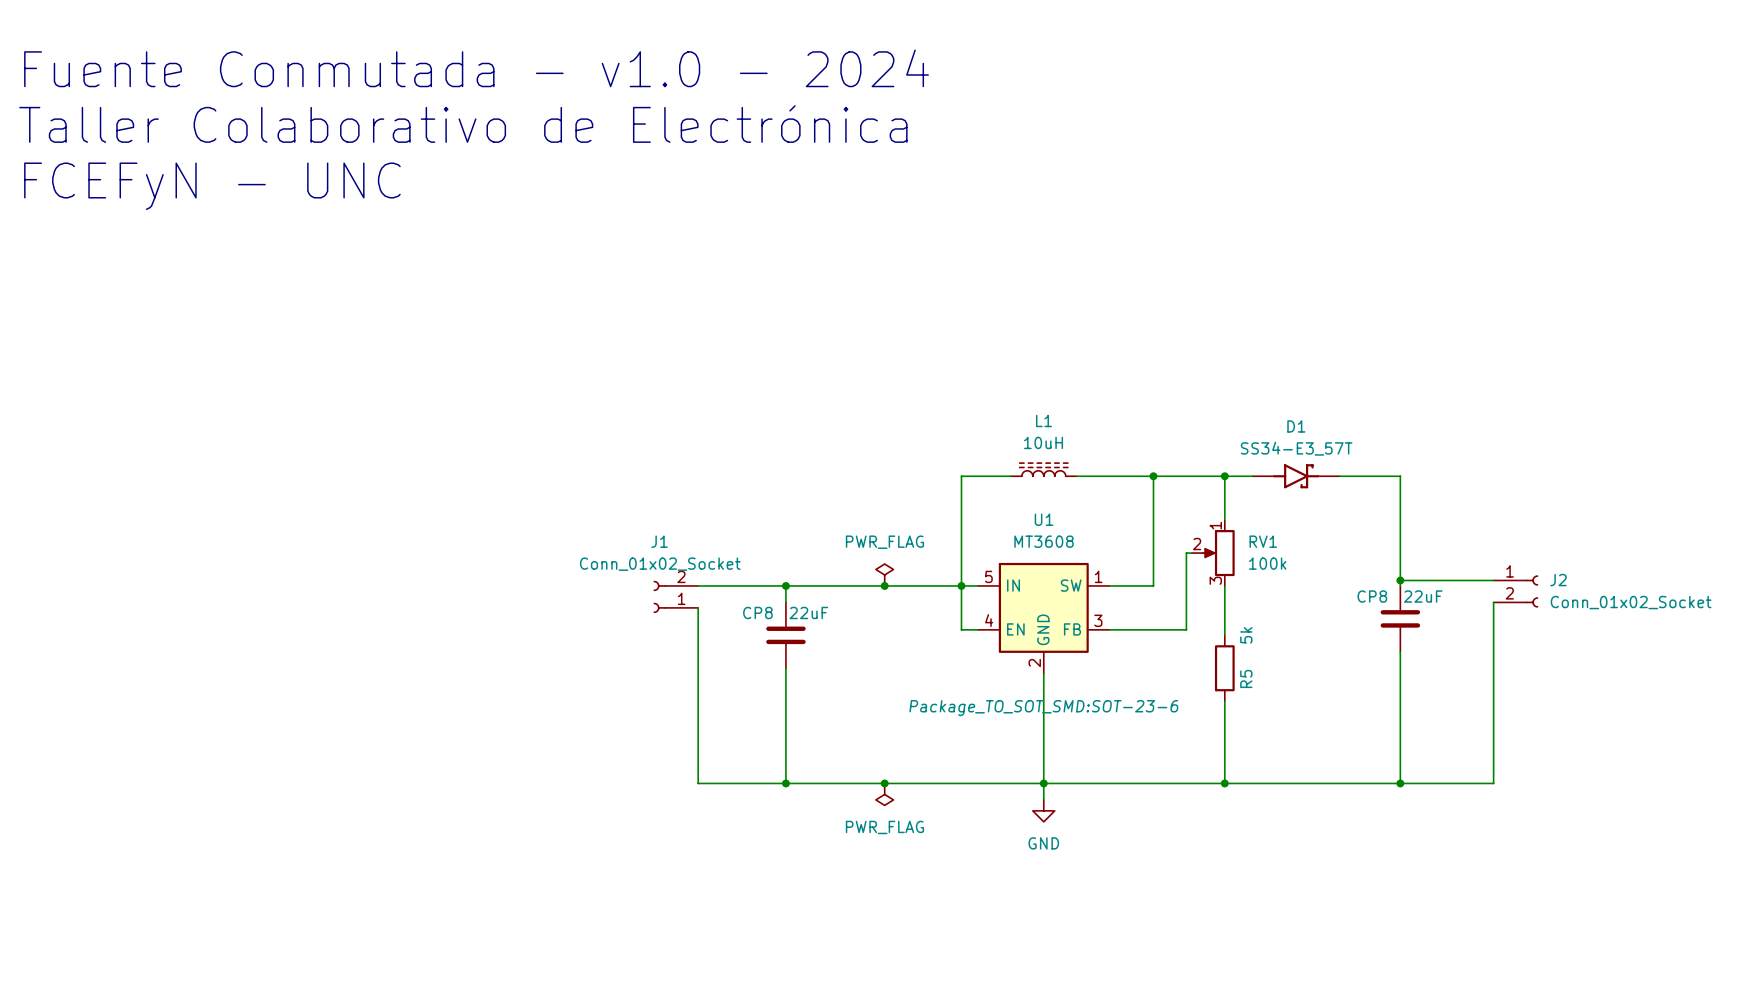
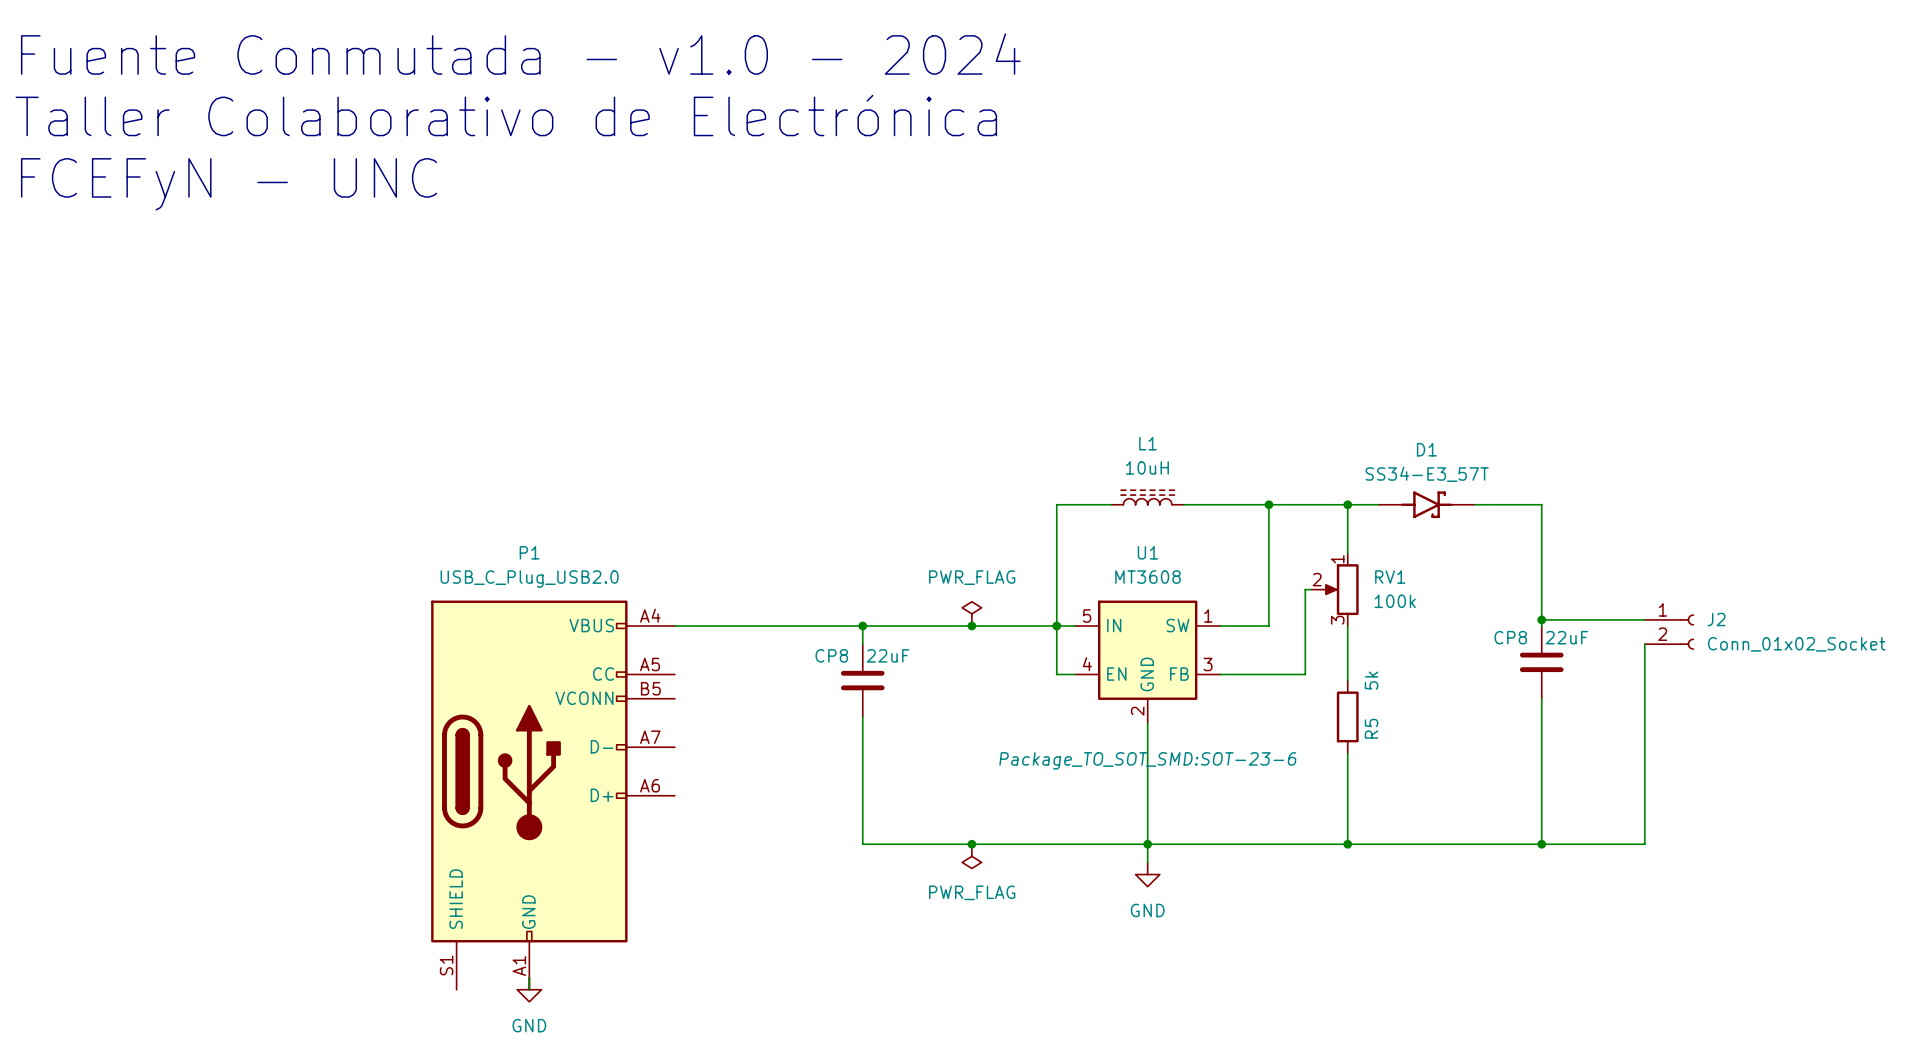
wire: none -> (674, 626) (765, 626)
J1: Conn_01x02_Socket (675, 596) -> none
wire: (698, 607) (698, 783) (785, 783) -> none
P1: none -> USB_C_Plug_USB2.0 (552, 795)
junction: (785, 783) -> none
wire: none -> (529, 977) (529, 989)
power symbol: none -> GND (529, 989)

